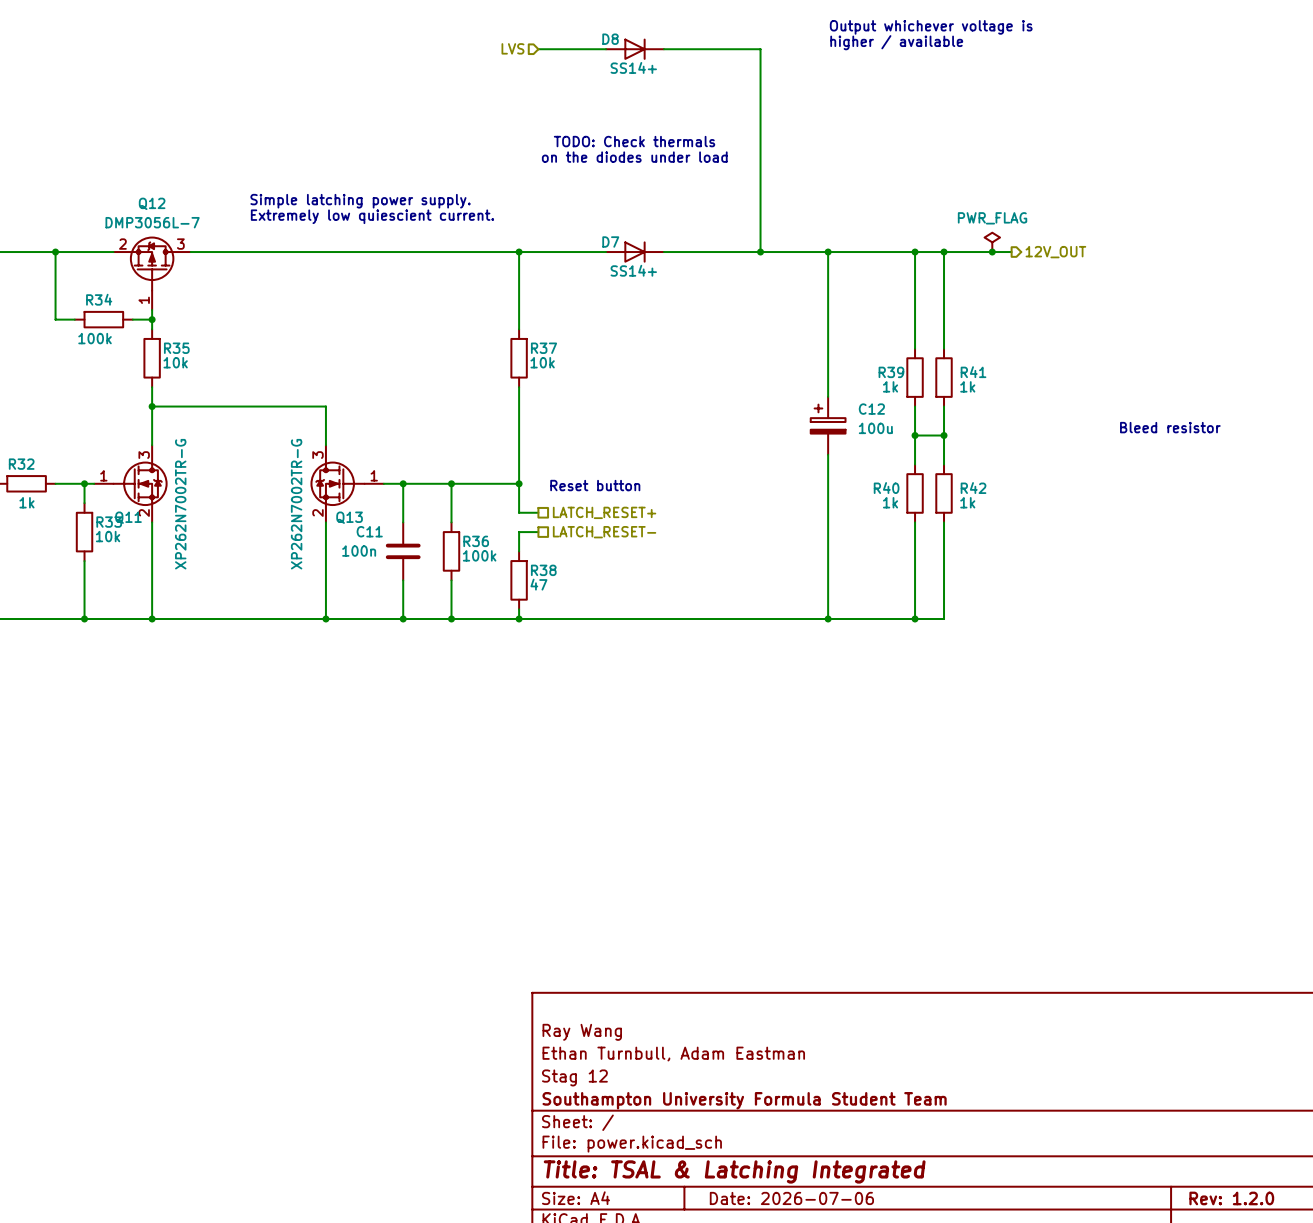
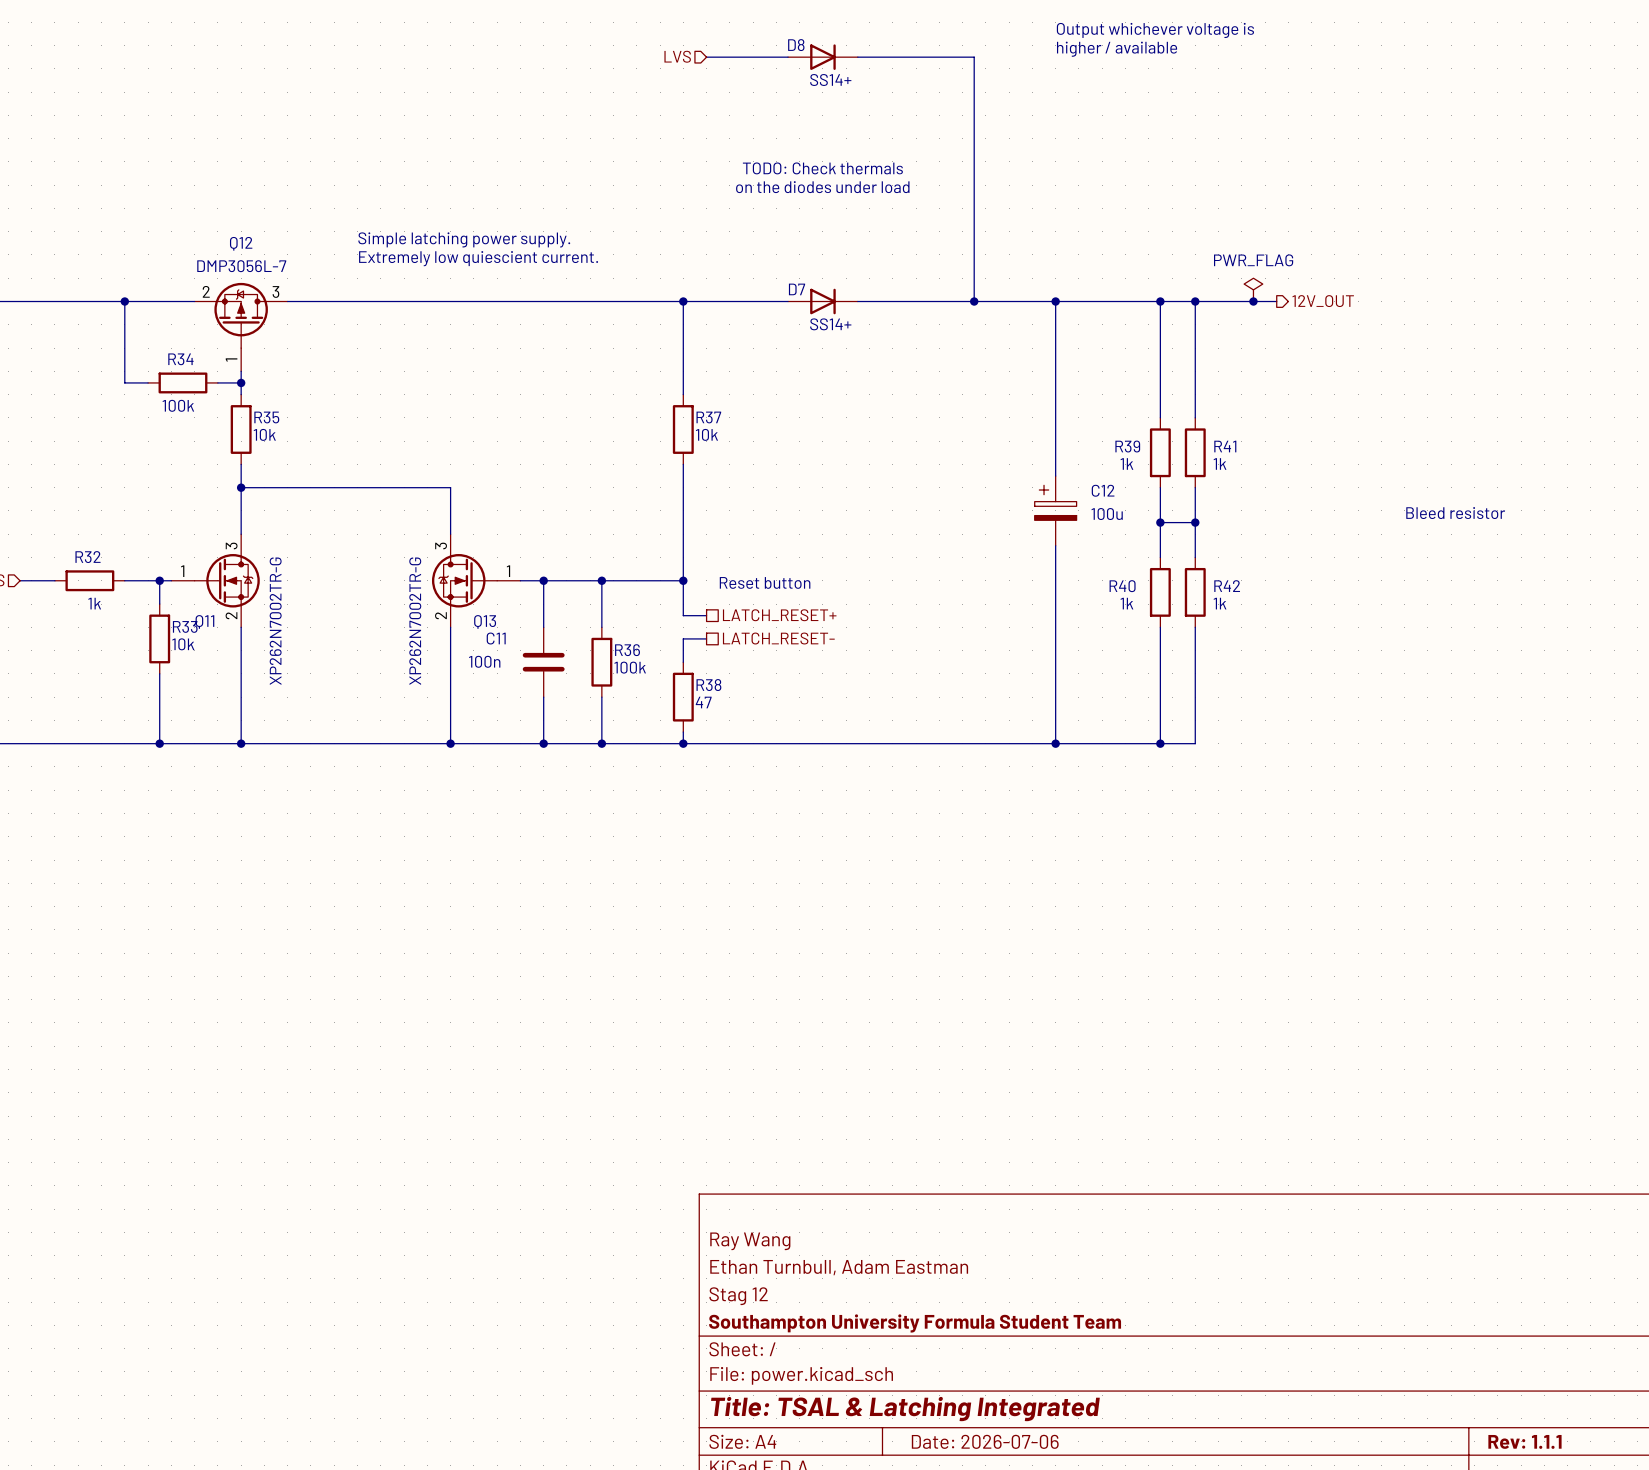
title block: Rev: 1.2.0 (1231, 1198) -> Rev: 1.1.1 (1524, 1441)

